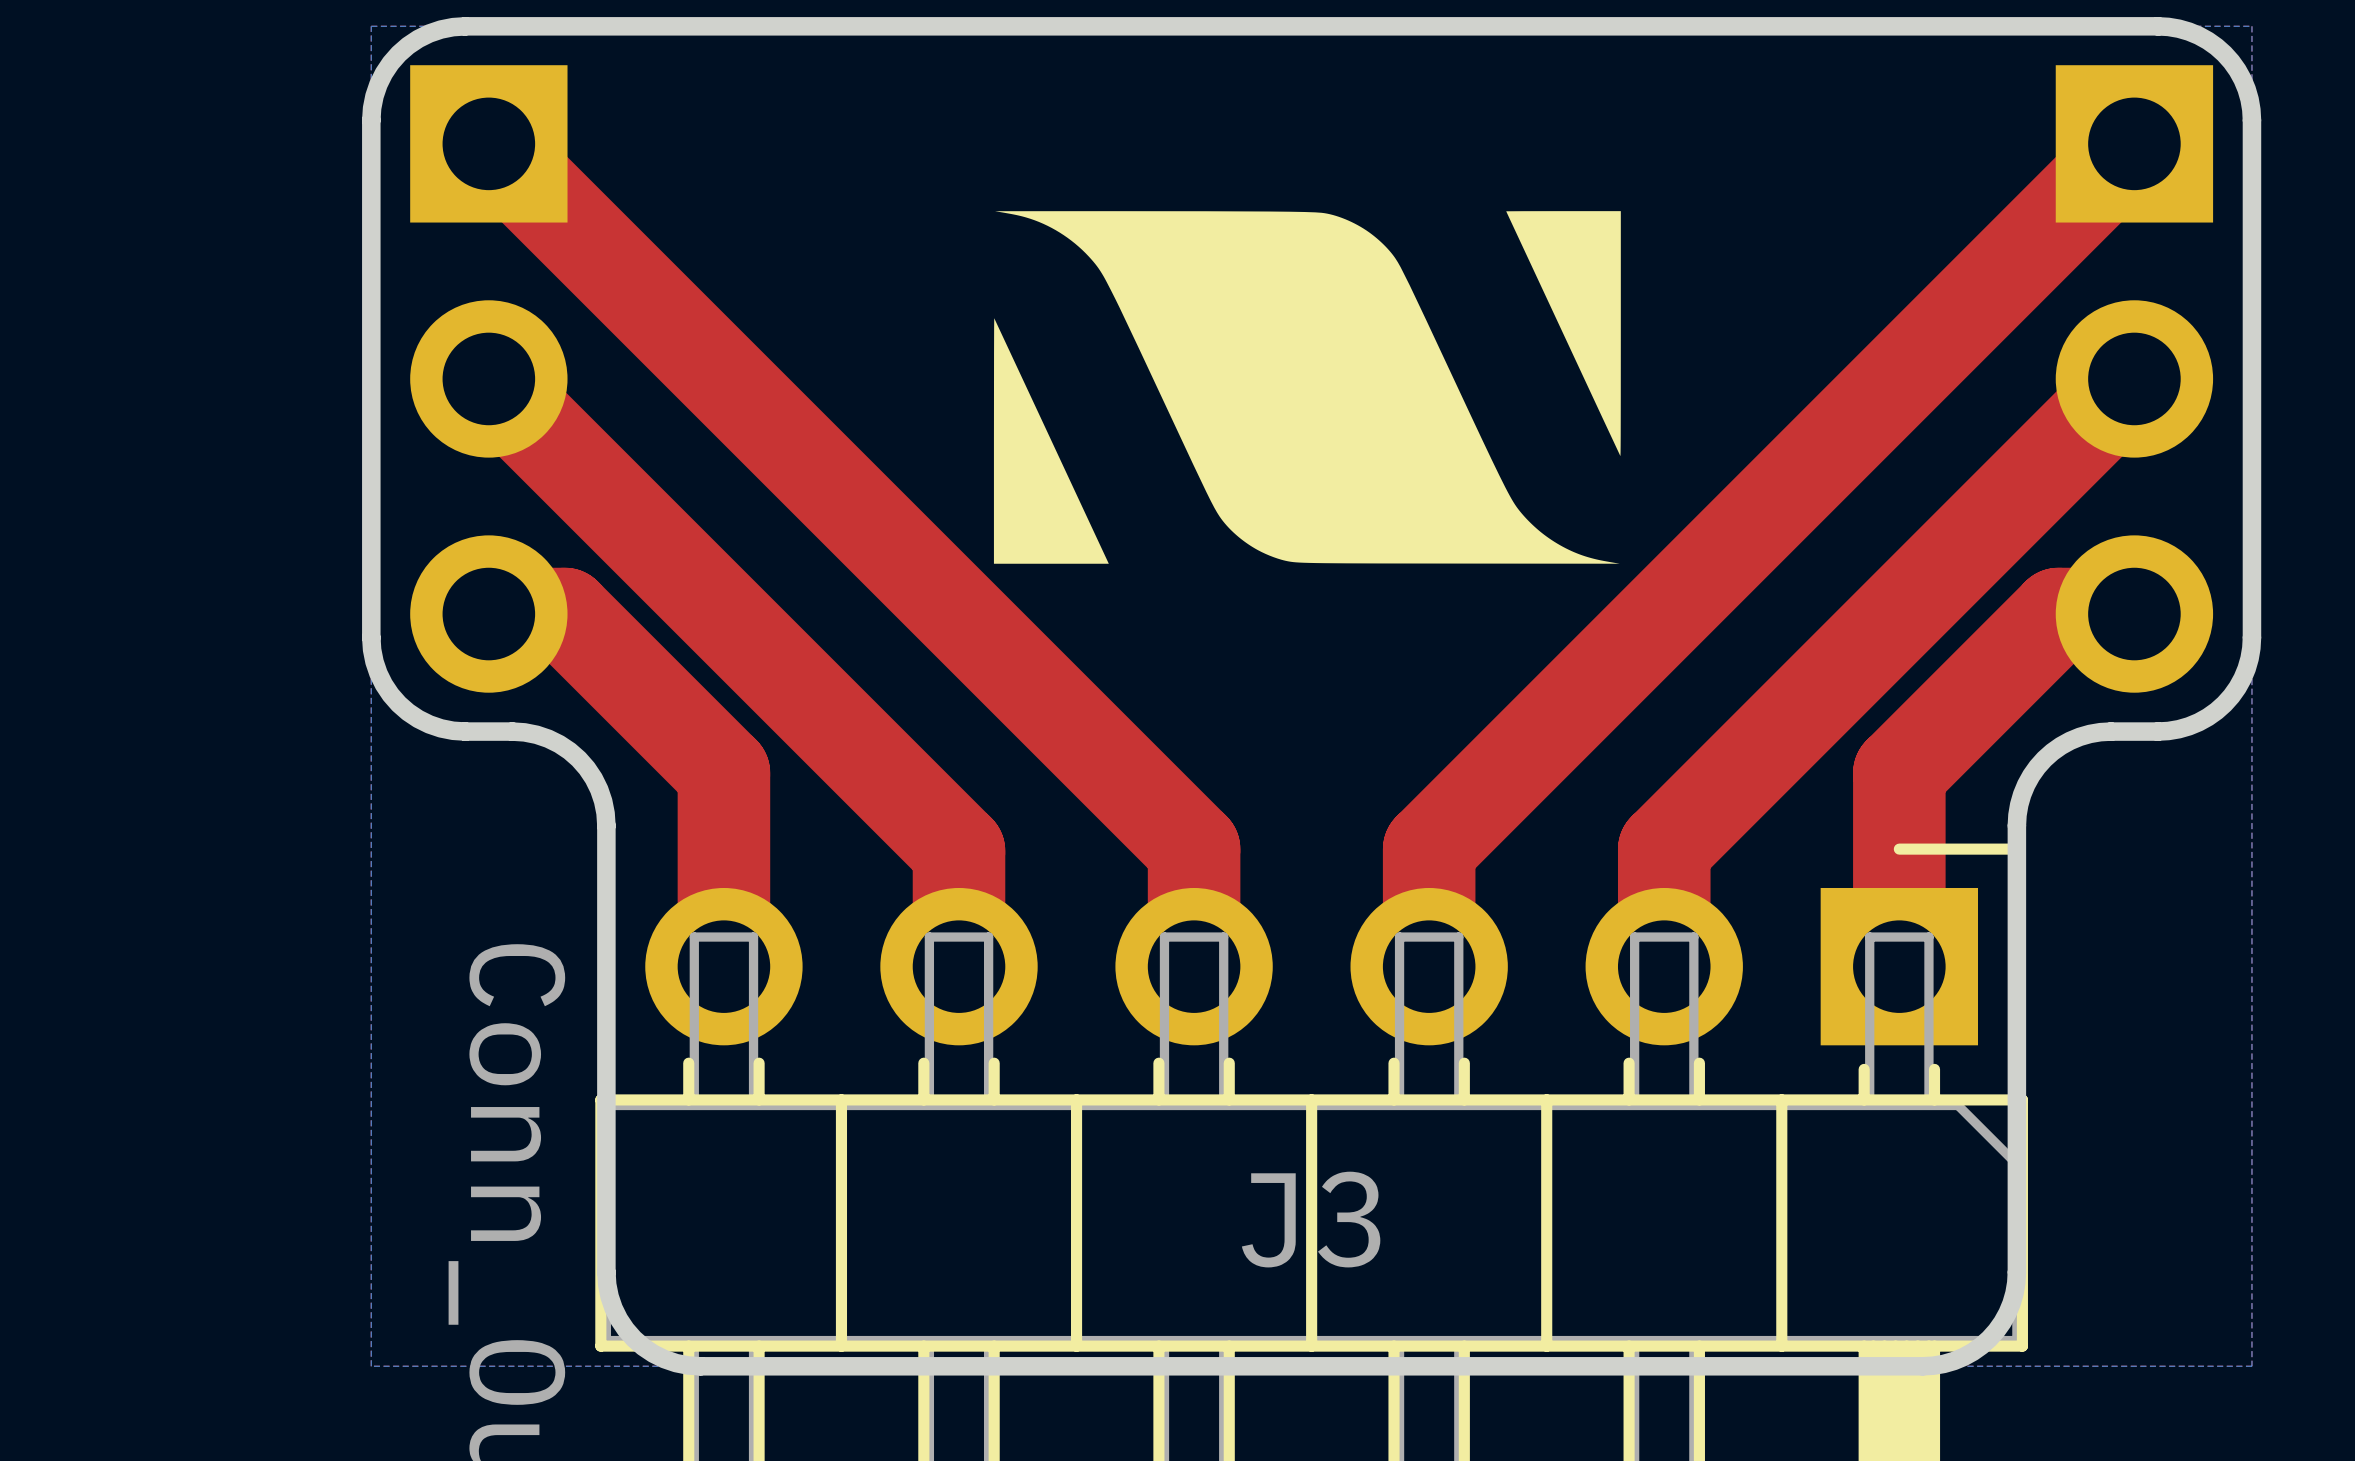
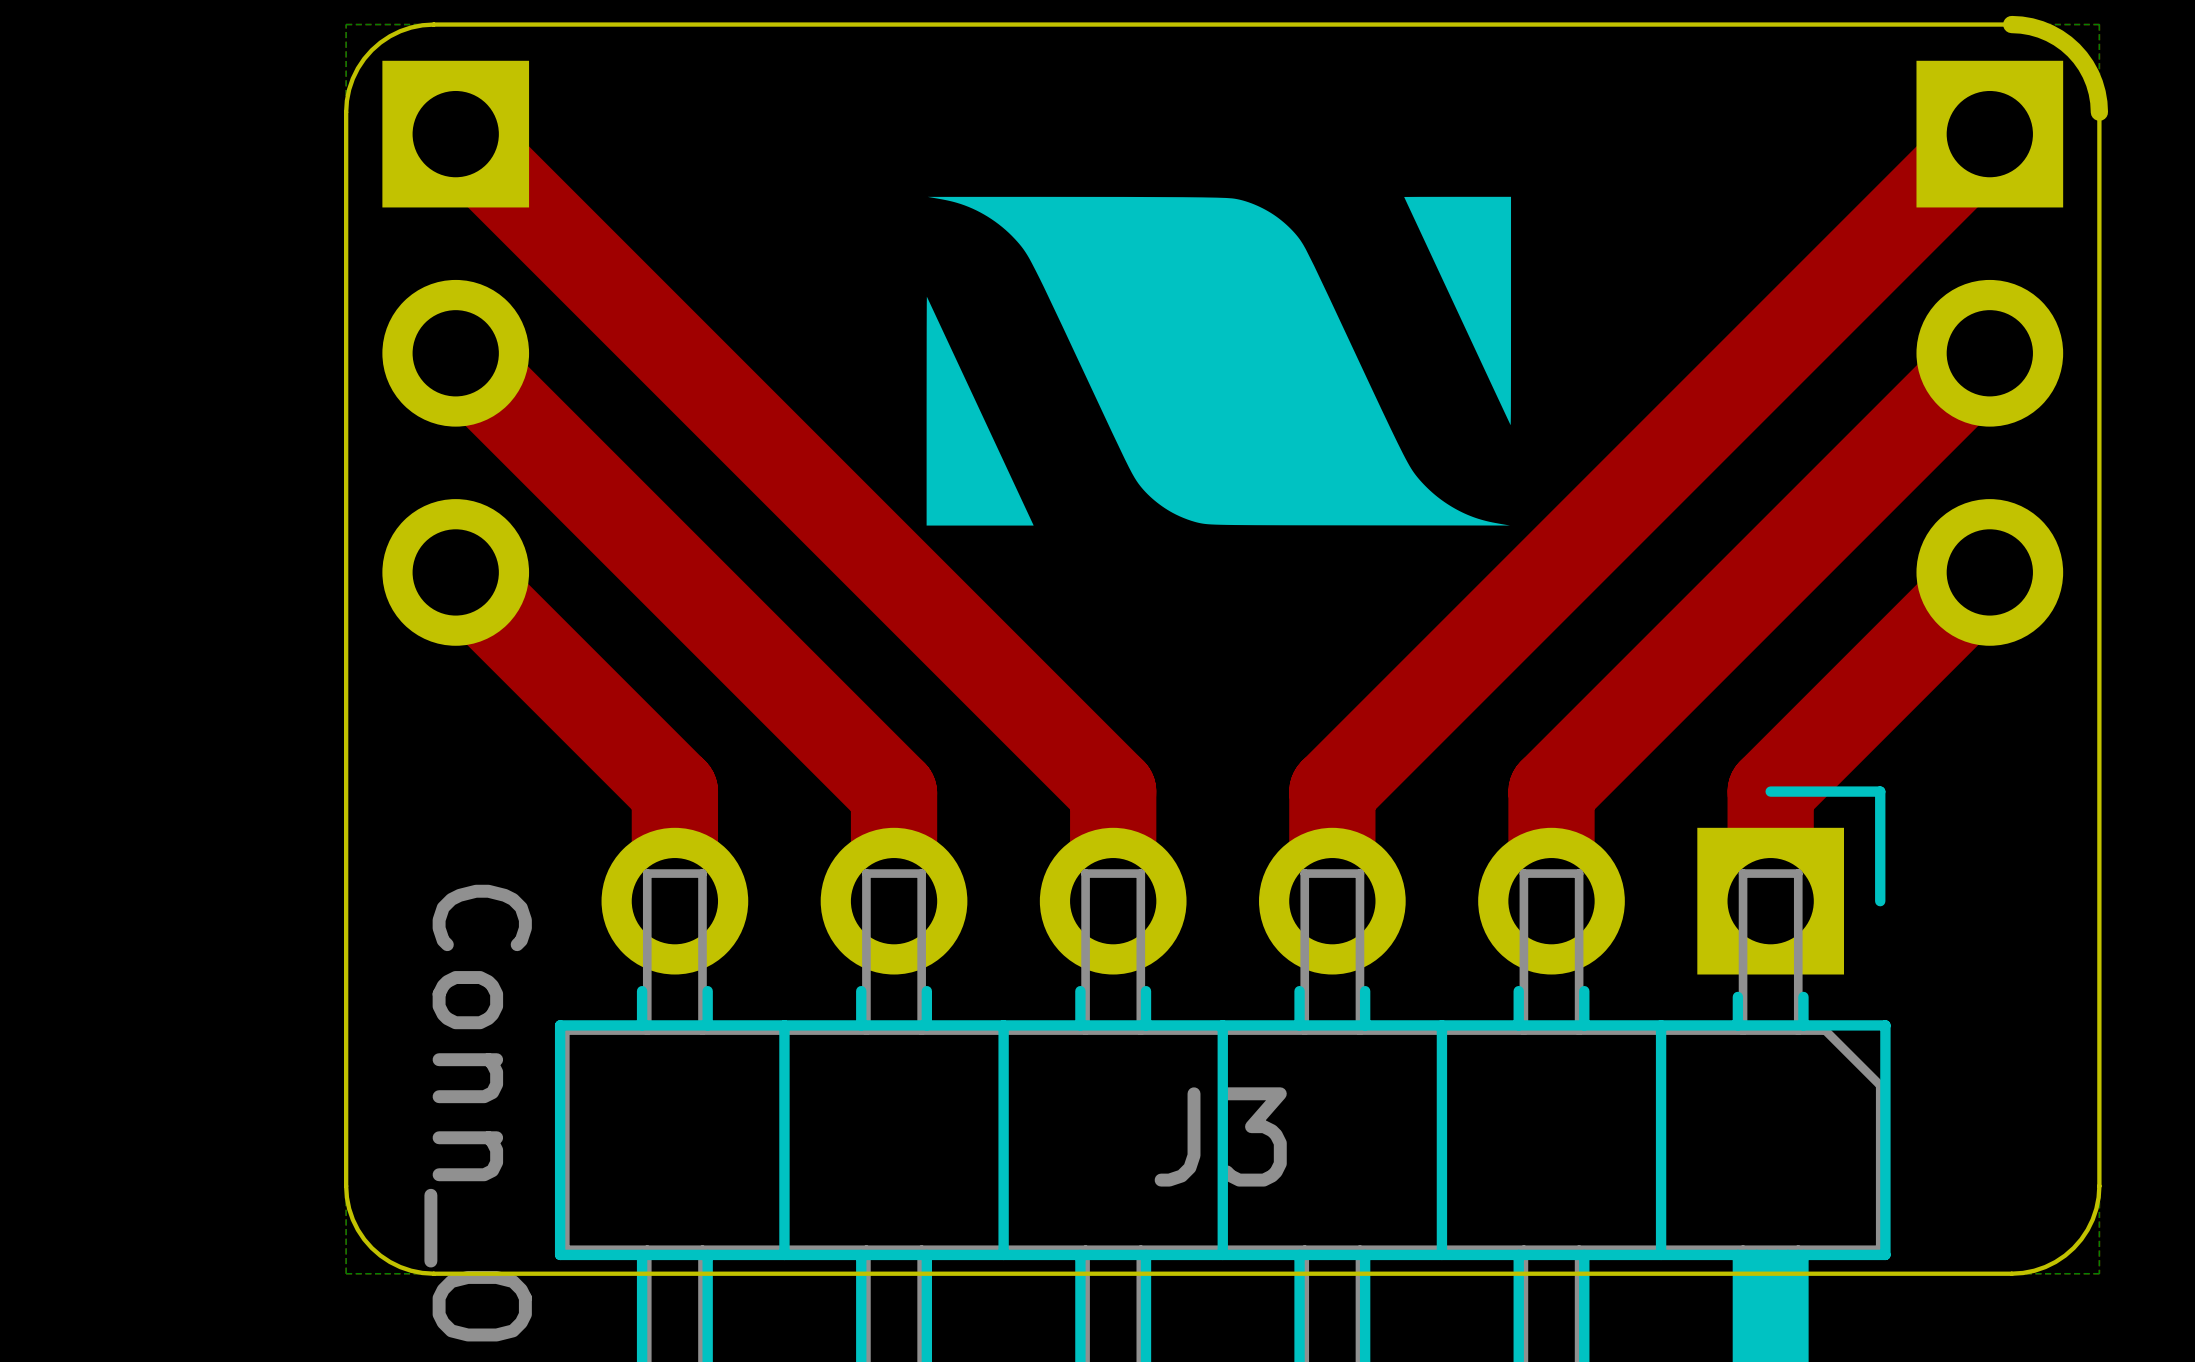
board edge width: thick (2157, 26) (465, 26) (441, 29) (429, 33) (408, 45) (390, 63) (378, 84) (372, 108) (371, 637) -> thin (2011, 24) (433, 24) (400, 31) (380, 42) (364, 58) (352, 78) (346, 100) (346, 594)
board edge width: thick (2251, 120) (2251, 637) -> thin (2099, 112) (2099, 594)
top track: (488, 614) (564, 614) (723, 772) (723, 849) -> (455, 572) (674, 791)
top track: (2134, 614) (2058, 614) (1899, 772) (1899, 849) -> (1989, 572) (1770, 791)
board edge: (371, 637) (374, 661) (383, 684) (398, 704) (418, 718) (441, 728) (453, 730) (524, 732) (548, 738) (559, 744) (578, 759) (593, 778) (599, 789) (603, 801) (606, 825) (607, 1284) (609, 1296) (618, 1319) (633, 1338) (653, 1353) (664, 1359) (676, 1363) (700, 1366) -> (346, 594) (346, 1186) (352, 1219) (364, 1239) (380, 1255) (400, 1267) (422, 1272) (652, 1273)
board edge: (2251, 637) (2249, 658) (2242, 678) (2231, 696) (2207, 717) (2188, 726) (2168, 730) (2100, 732) (2079, 736) (2060, 745) (2044, 759) (2026, 784) (2019, 804) (2016, 825) (2016, 1272) (2014, 1293) (2002, 1322) (1981, 1345) (1953, 1361) (1922, 1366) -> (2099, 594) (2099, 1186) (2092, 1219) (2081, 1239) (2065, 1255) (2045, 1267) (2023, 1272) (1792, 1273)
board edge width: thick (1922, 1366) (700, 1366) -> thin (1792, 1273) (652, 1273)

